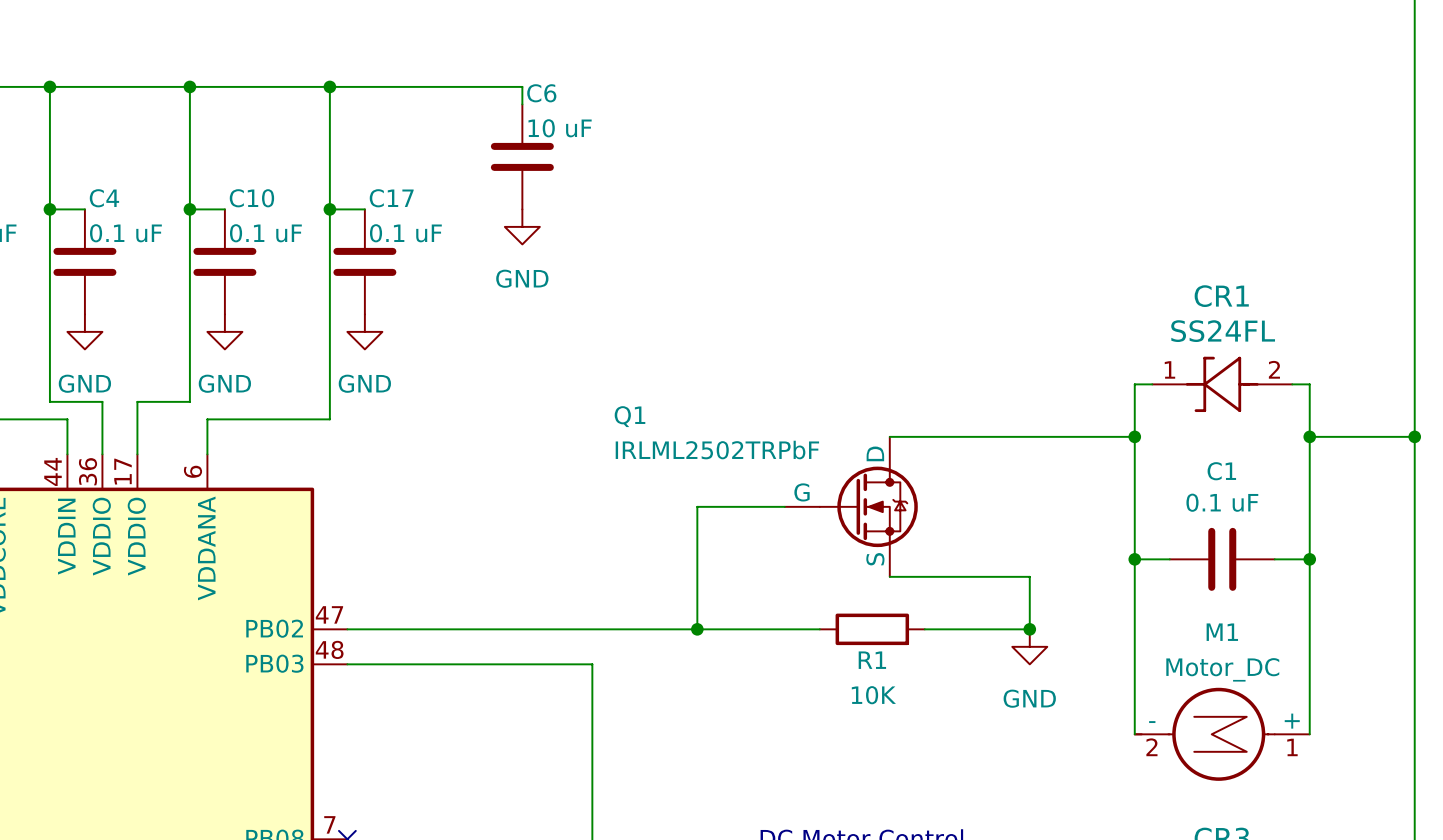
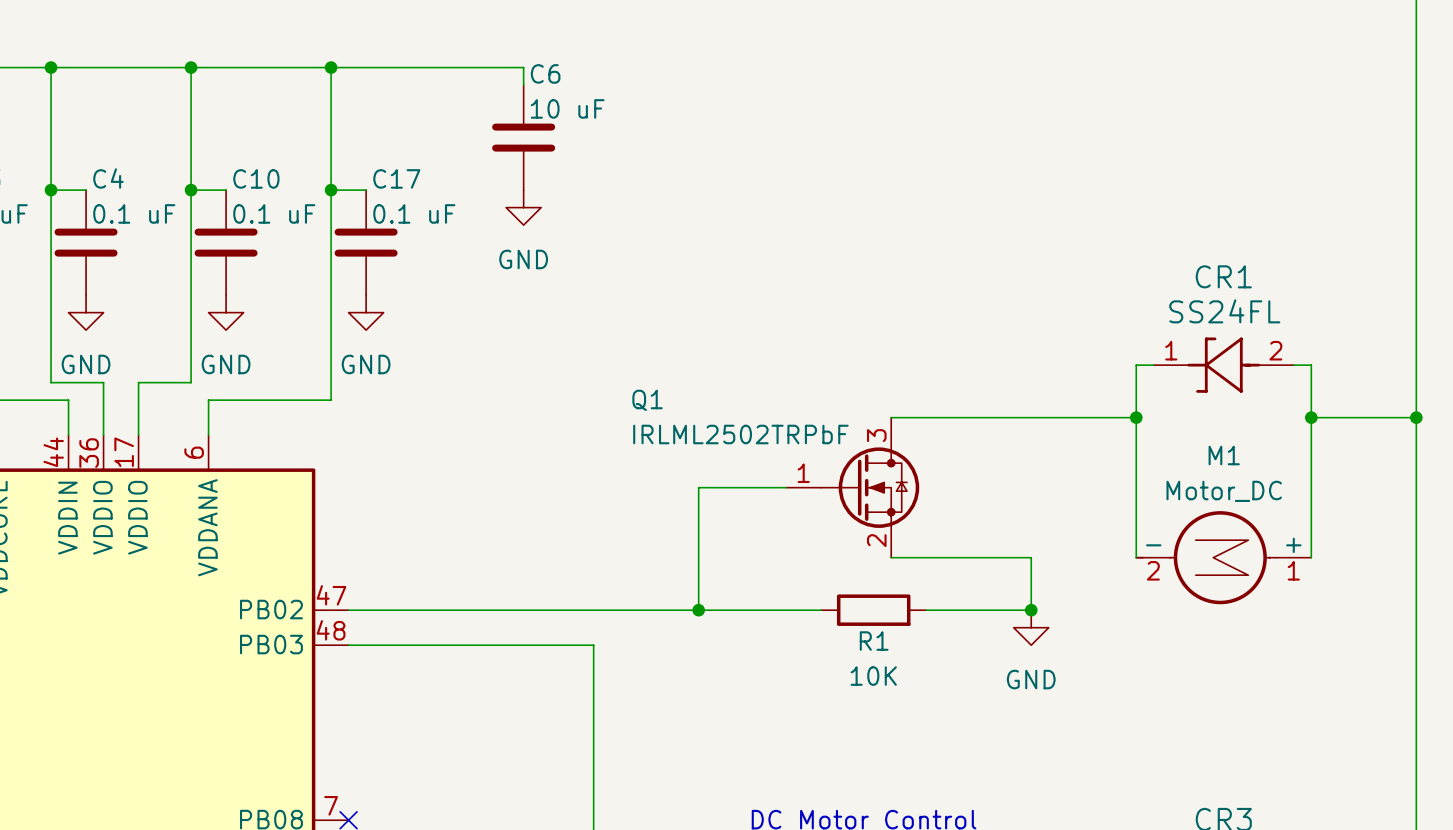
Q1 symbol: [784, 436, 918, 577] -> [786, 417, 920, 558]
wire: (1134, 559) (1169, 559) -> none
junction: (1134, 559) -> none
C1: 0.1 uF (1222, 559) -> none
wire: (1274, 559) (1309, 559) -> none
junction: (1309, 559) -> none
wire: (1134, 576) (1134, 734) -> none
wire: (1309, 576) (1309, 734) -> none
M1 position: (1222, 734) -> (1223, 557)

